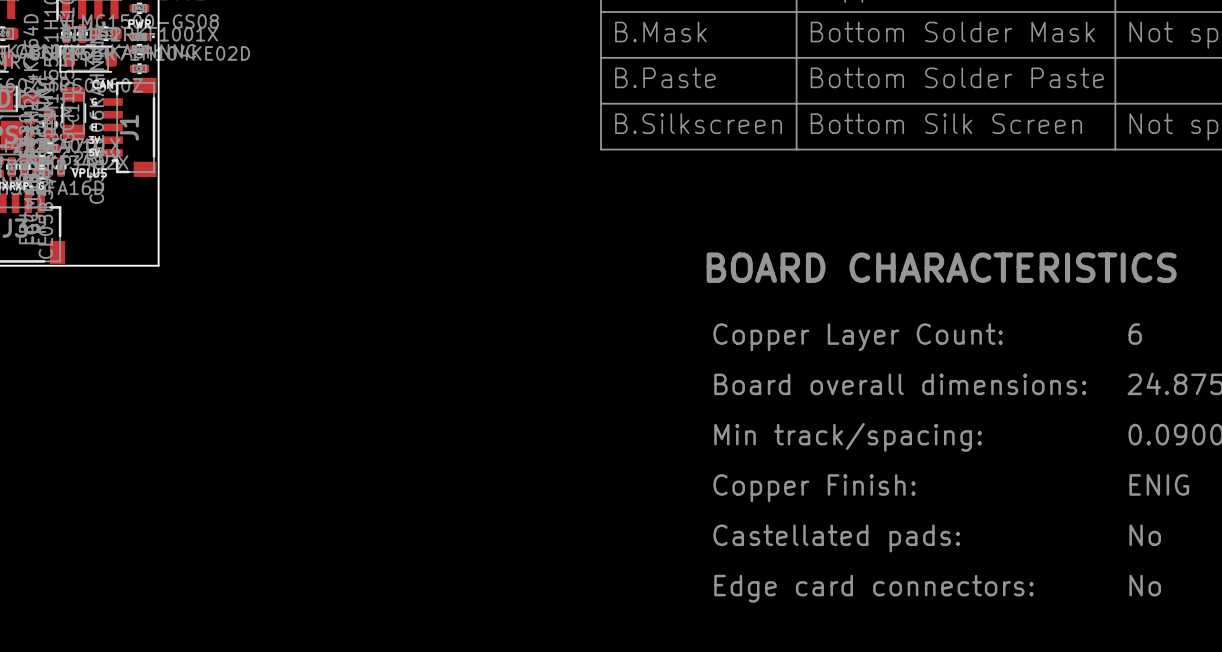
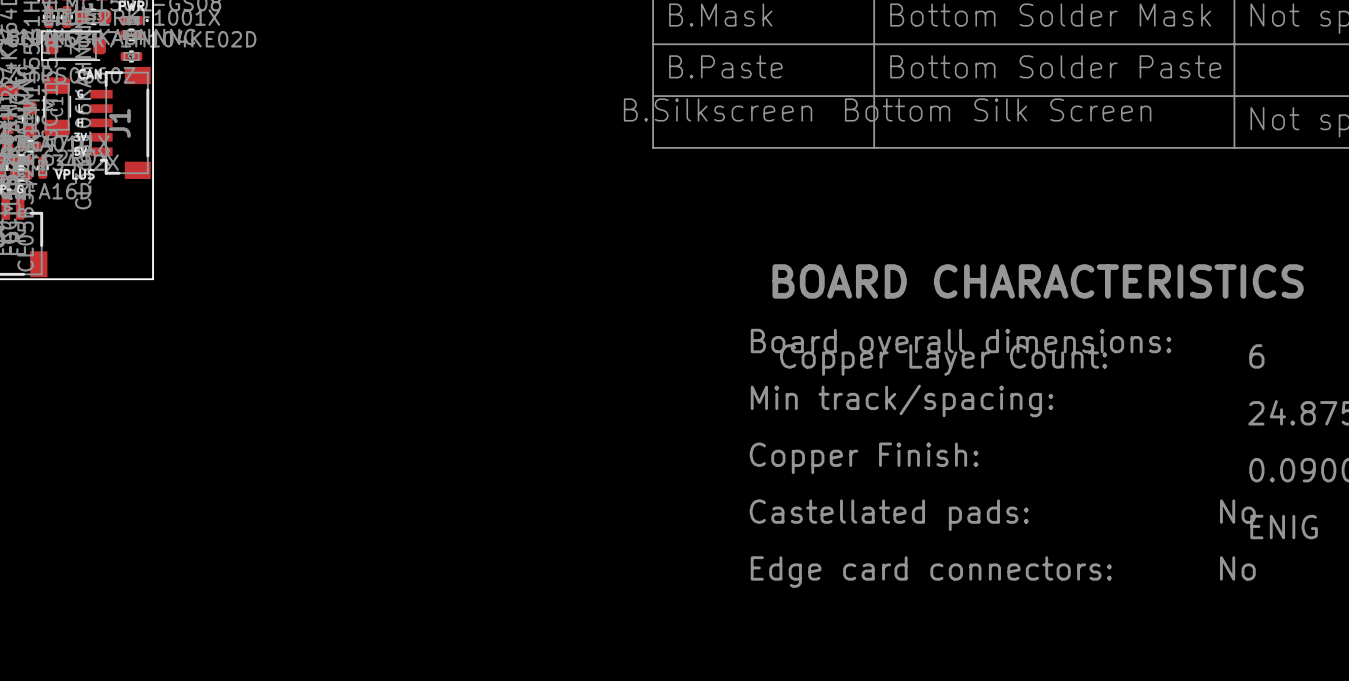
text position: B.Silkscreen (698, 123) -> B.Silkscreen (718, 109)
text position: Bottom Silk Screen (946, 123) -> Bottom Silk Screen (998, 109)
text position: Board overall dimensions: (900, 384) -> Board overall dimensions: (961, 341)
text position: Min track/spacing: (848, 437) -> Min track/spacing: (902, 400)
text: none -> No (1237, 511)
text position: Copper Finish: (814, 488) -> Copper Finish: (864, 458)
text position: No (1145, 535) -> No (1237, 568)
text position: Castellated pads: (836, 538) -> Castellated pads: (889, 515)
text: No (1145, 585) -> none
text position: Edge card connectors: (873, 588) -> Edge card connectors: (931, 572)

